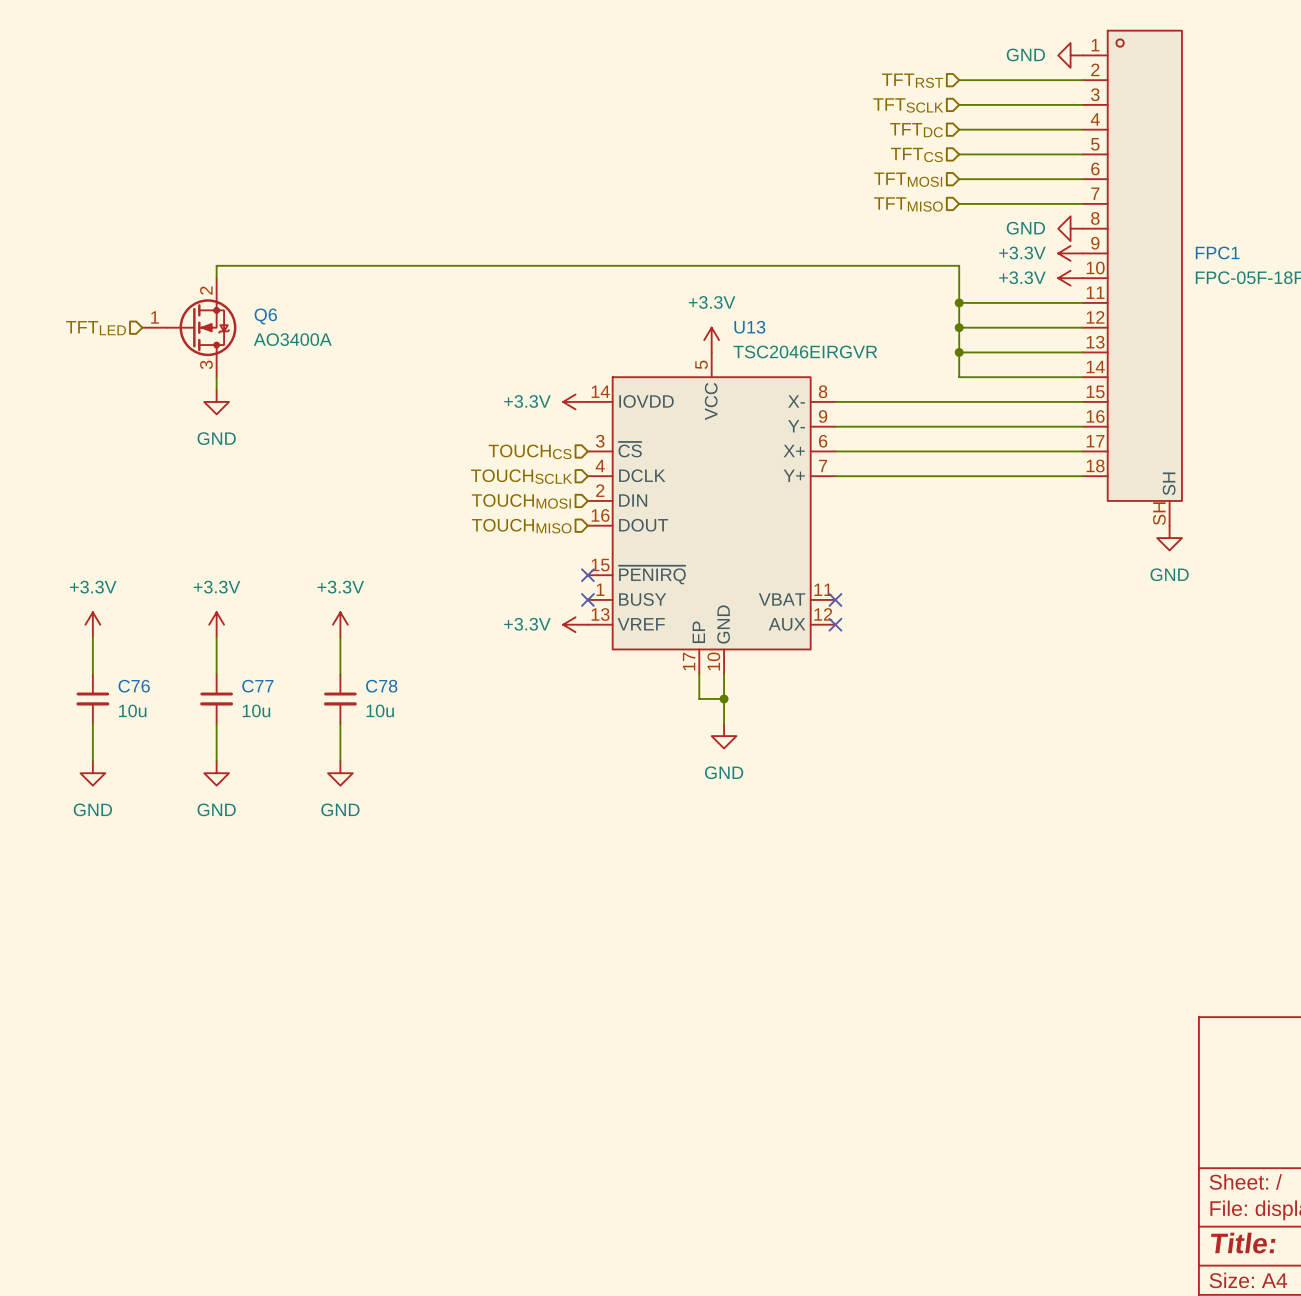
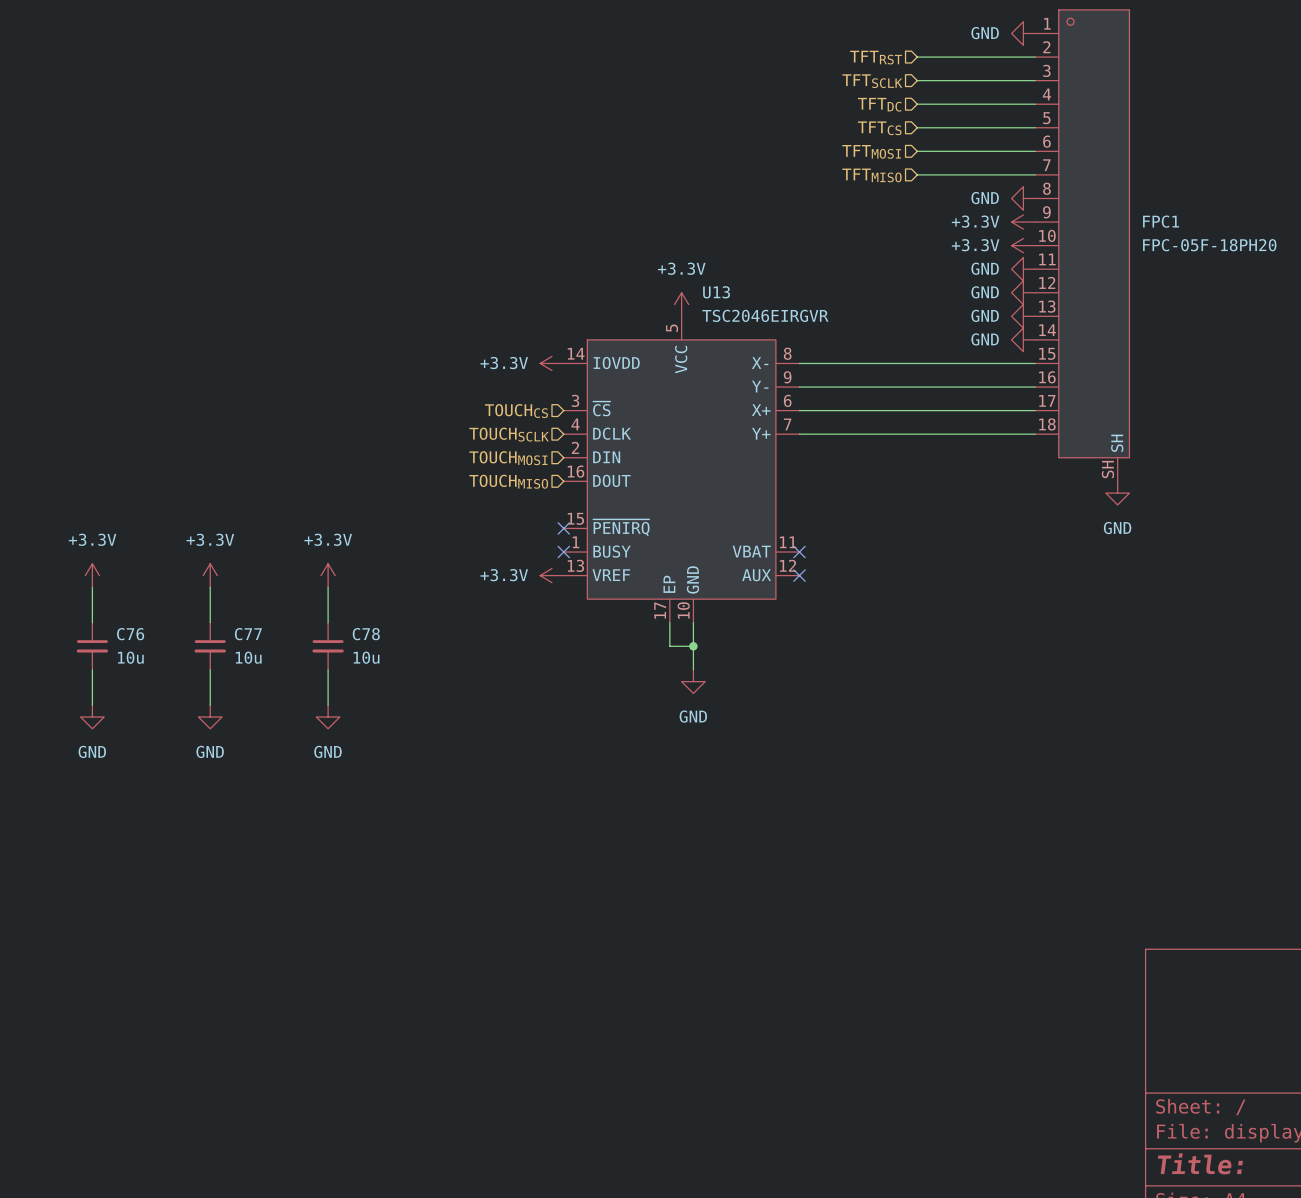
wire: (216, 278) (216, 265) (959, 265) (959, 377) (1082, 377) -> none
wire: (959, 302) (1082, 302) -> none
junction: (959, 302) -> none
power symbol: none -> GND (1023, 269)
Q6: AO3400A (189, 327) -> none
wire: (959, 327) (1082, 327) -> none
junction: (959, 327) -> none
power symbol: none -> GND (1023, 292)
hierarchical label: TFTLED (96, 328) -> none
wire: (959, 352) (1082, 352) -> none
junction: (959, 352) -> none
power symbol: none -> GND (1023, 316)
wire: (216, 377) (216, 389) -> none
power symbol: none -> GND (1023, 339)
power symbol: GND (216, 401) -> none

